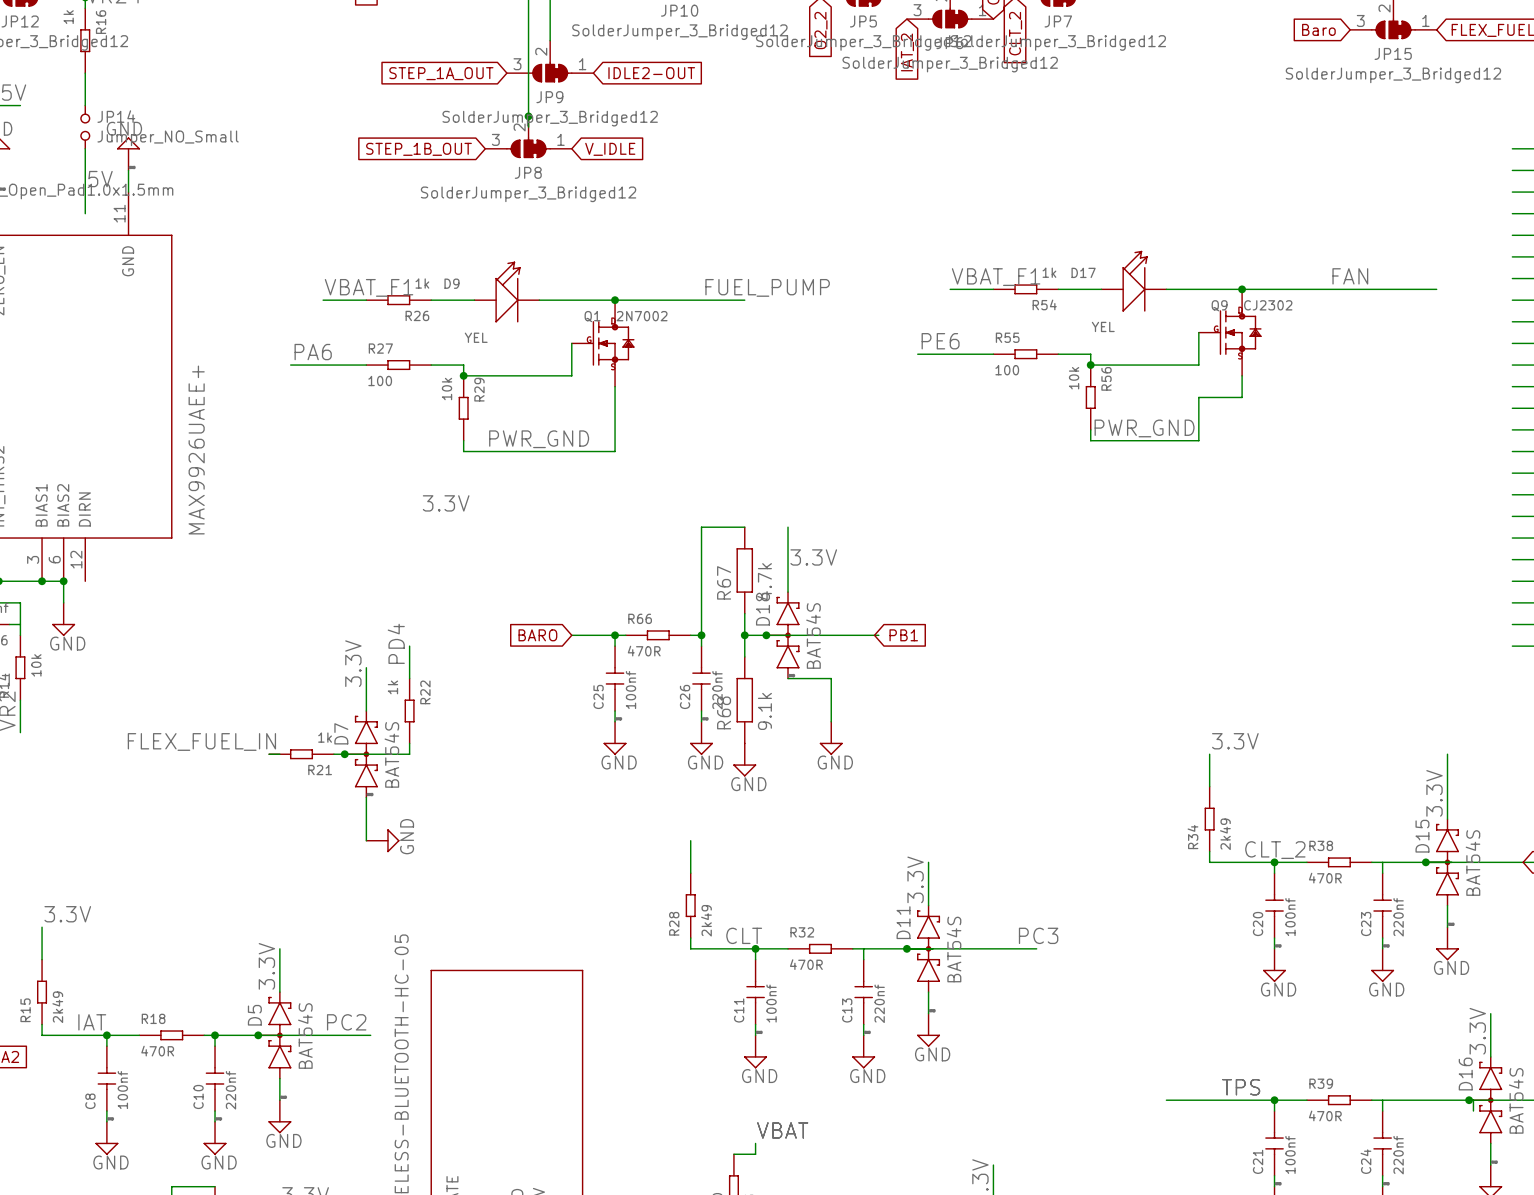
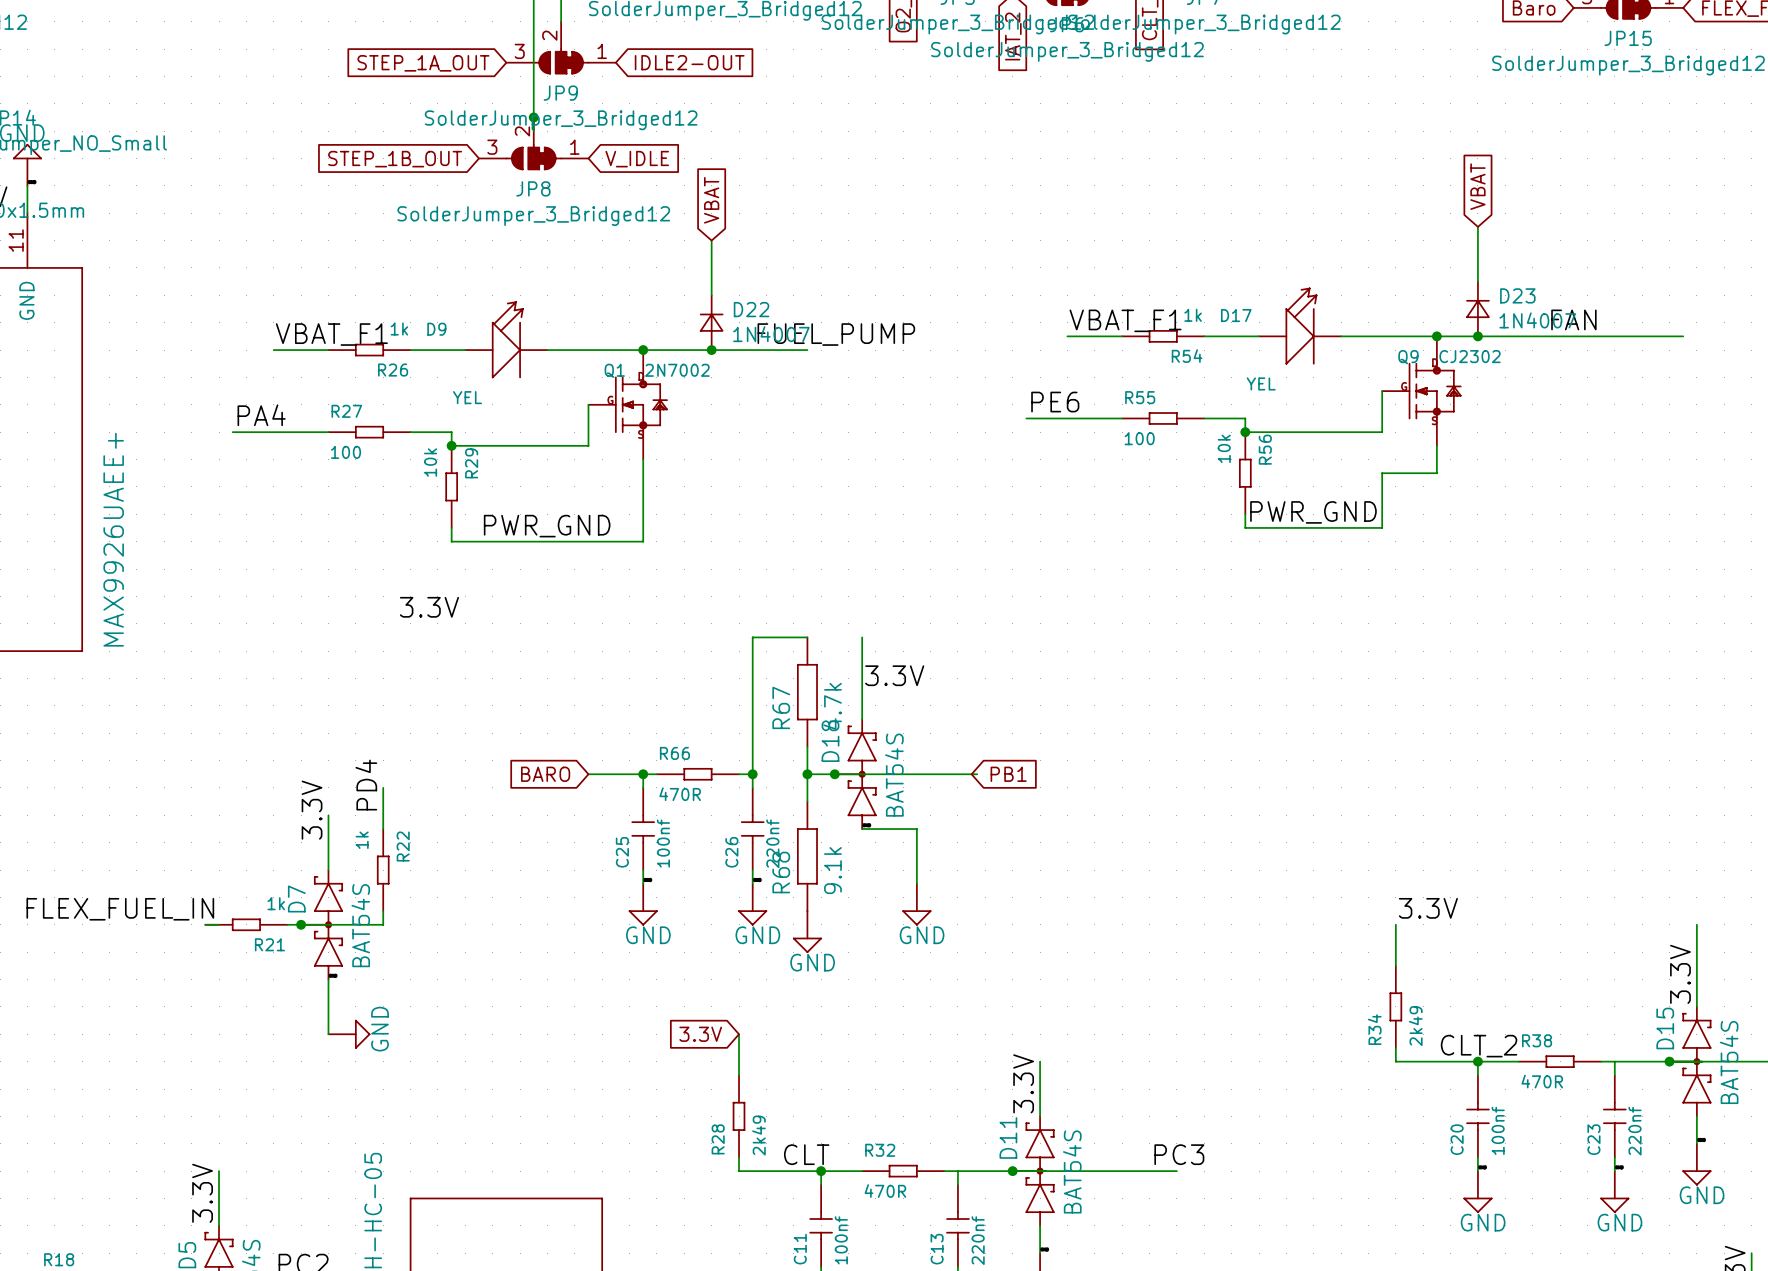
global label: none -> VBAT (1477, 186)
global label: none -> VBAT (711, 200)
wire: none -> (1477, 226) (1477, 281)
wire: none -> (711, 240) (711, 295)
D23: none -> 1N4007 (1477, 309)
D22: none -> 1N4007 (711, 322)
junction: none -> (1477, 336)
junction: none -> (711, 350)
label: PA6 (313, 352) -> PA4 (261, 415)
global label: none -> 3.3V (700, 1034)

